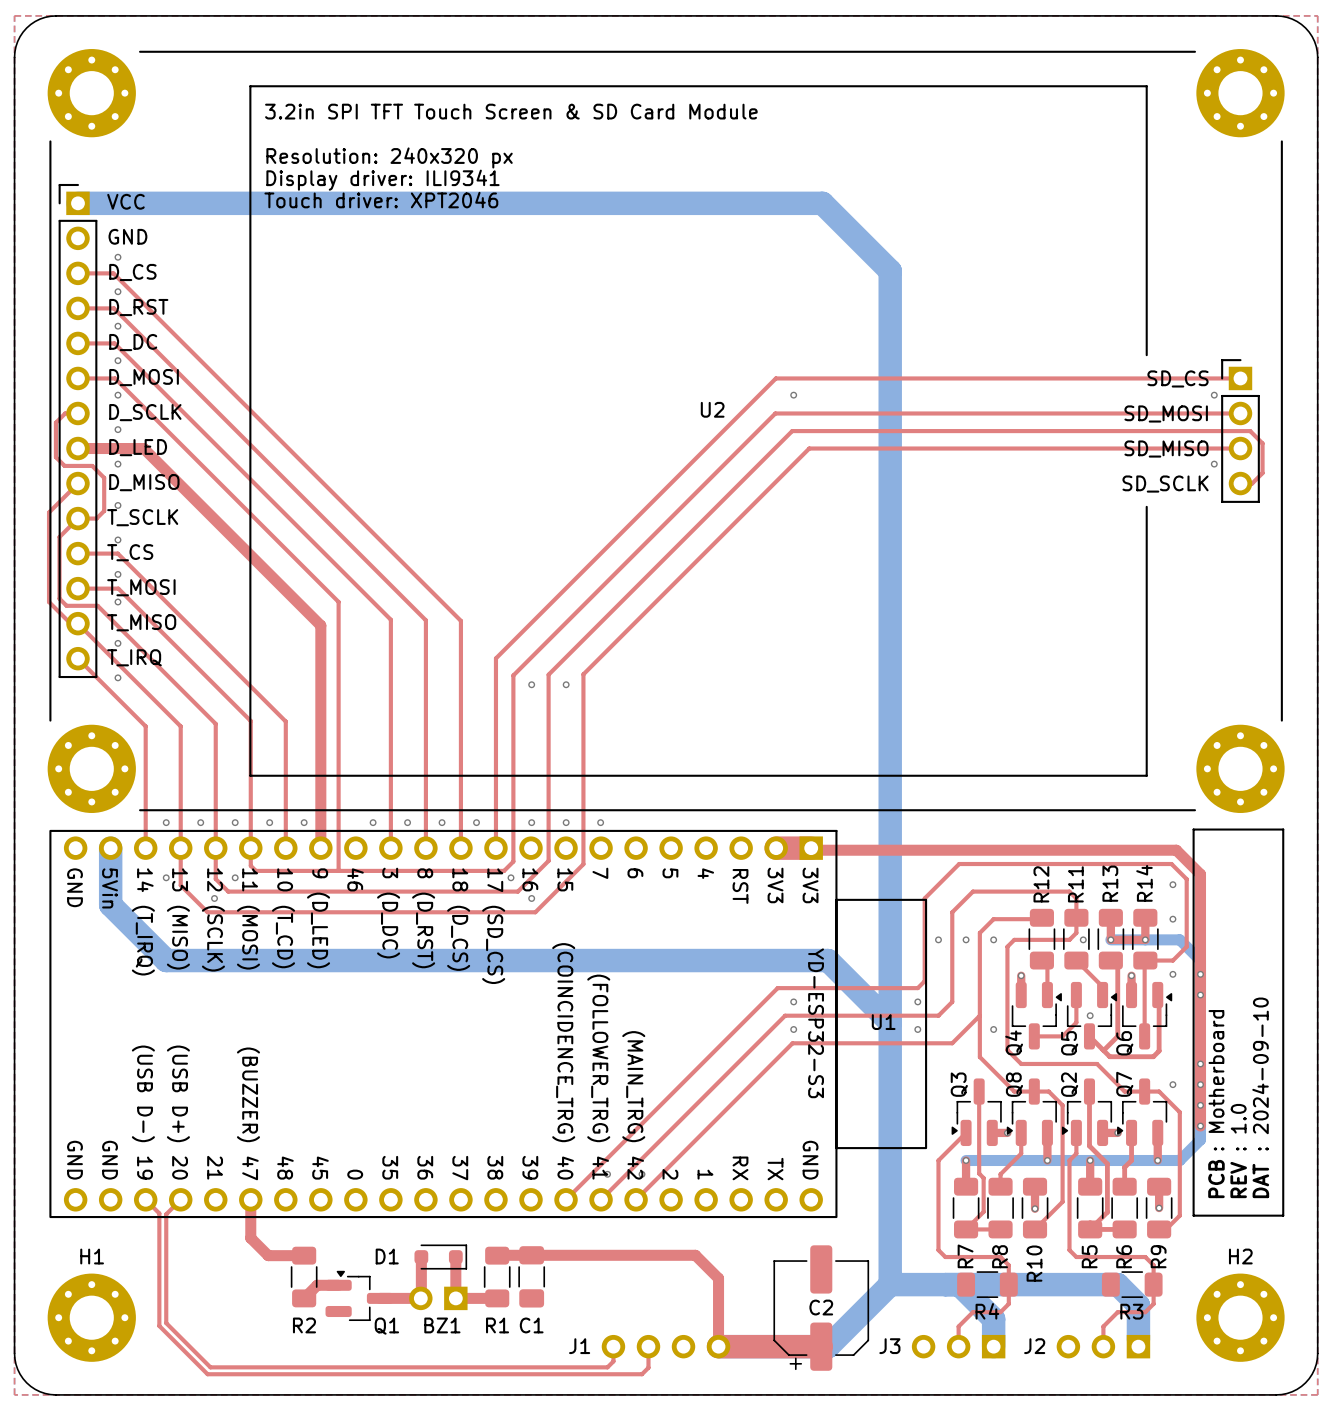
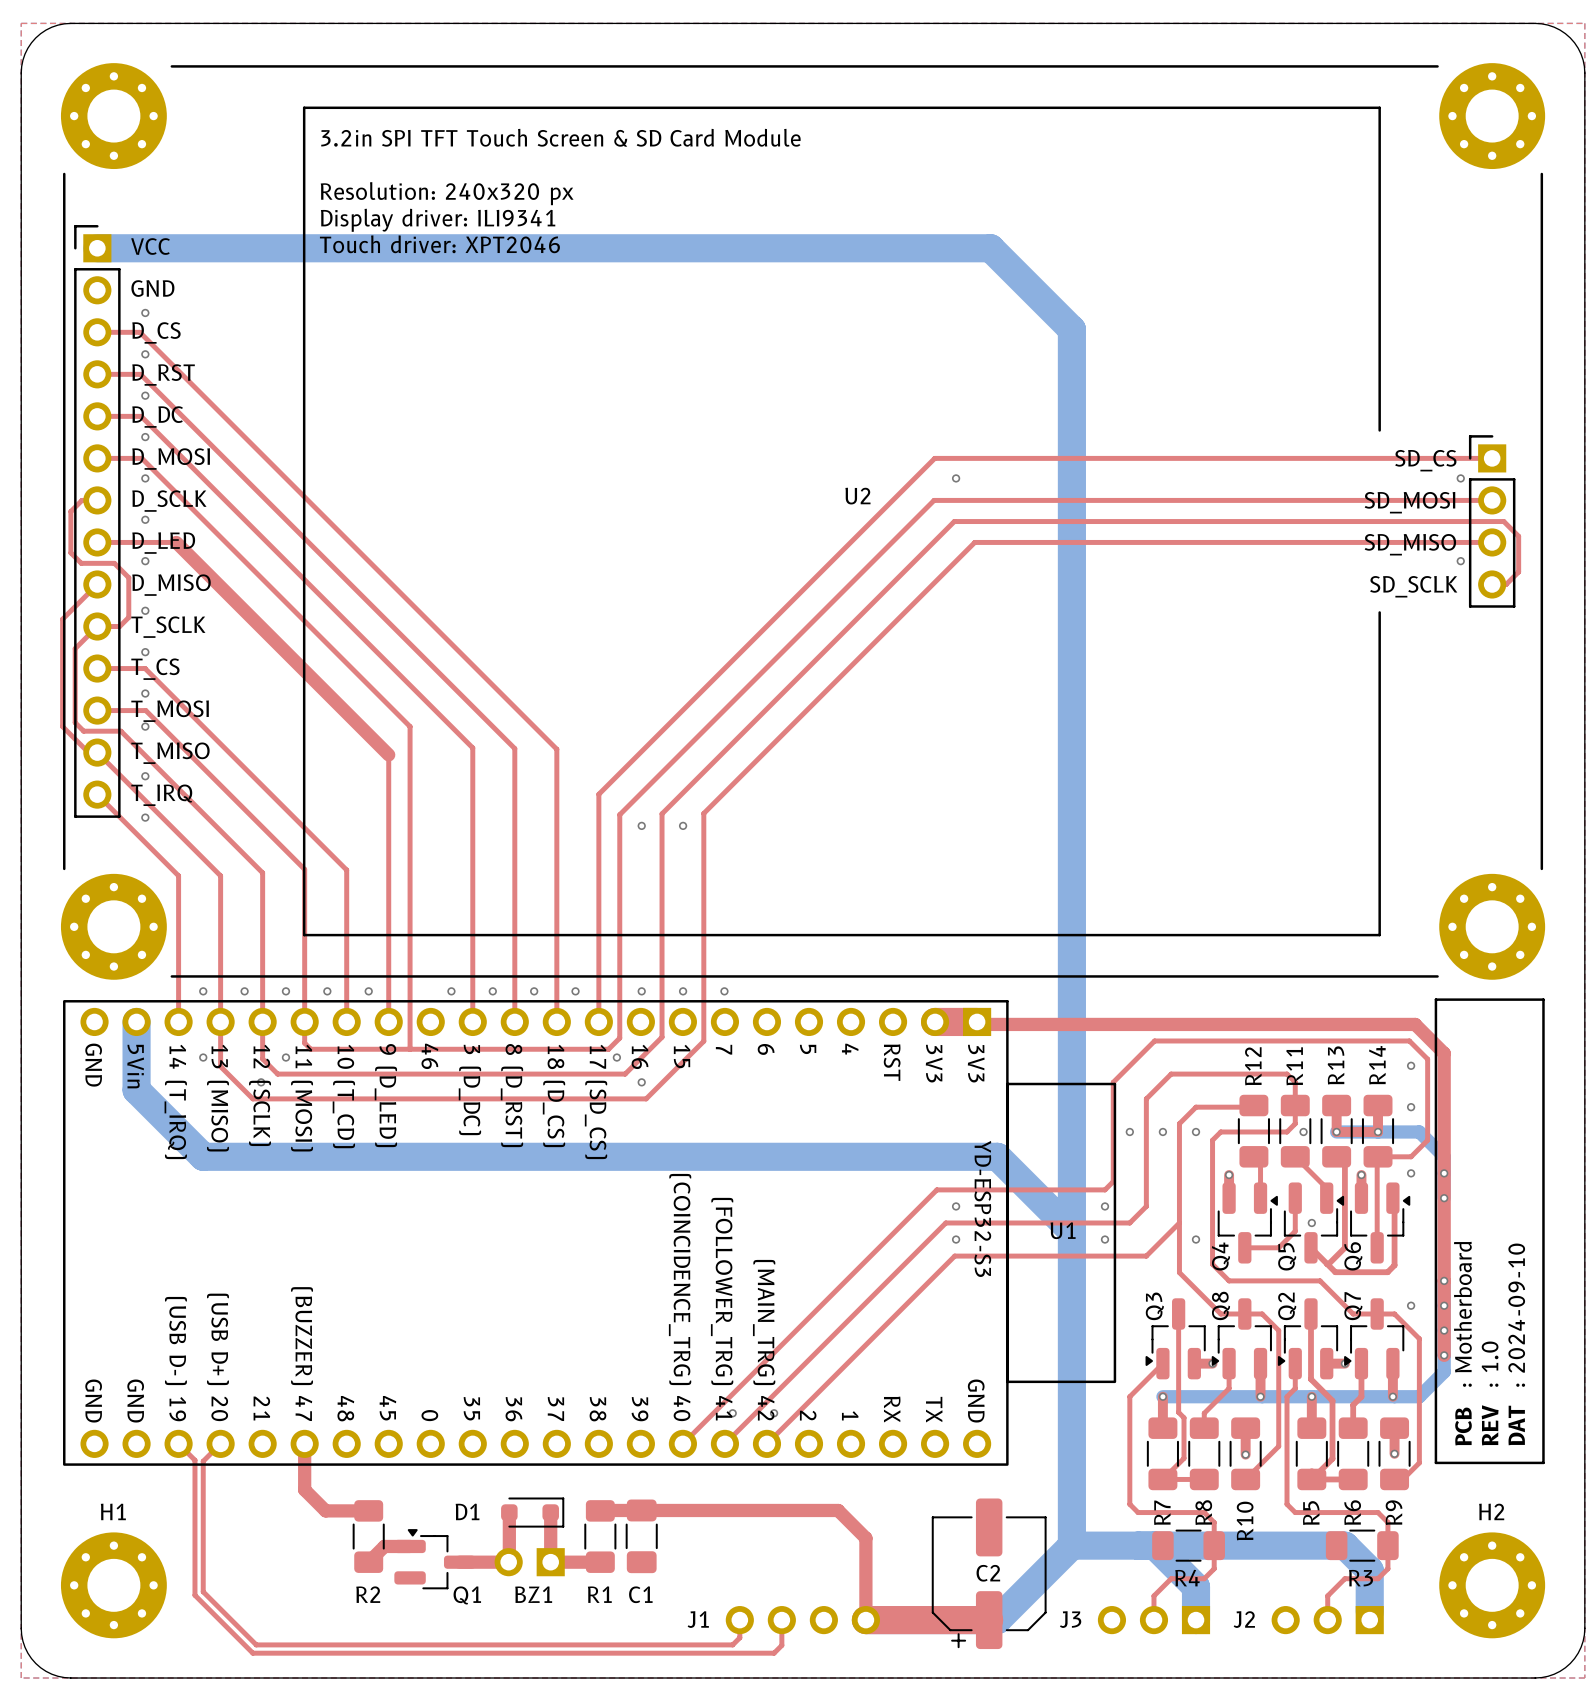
top track width: thick (77, 448) (143, 448) -> thin (97, 542) (176, 542)
top track width: thick (320, 625) (320, 848) -> thin (388, 754) (388, 1021)

